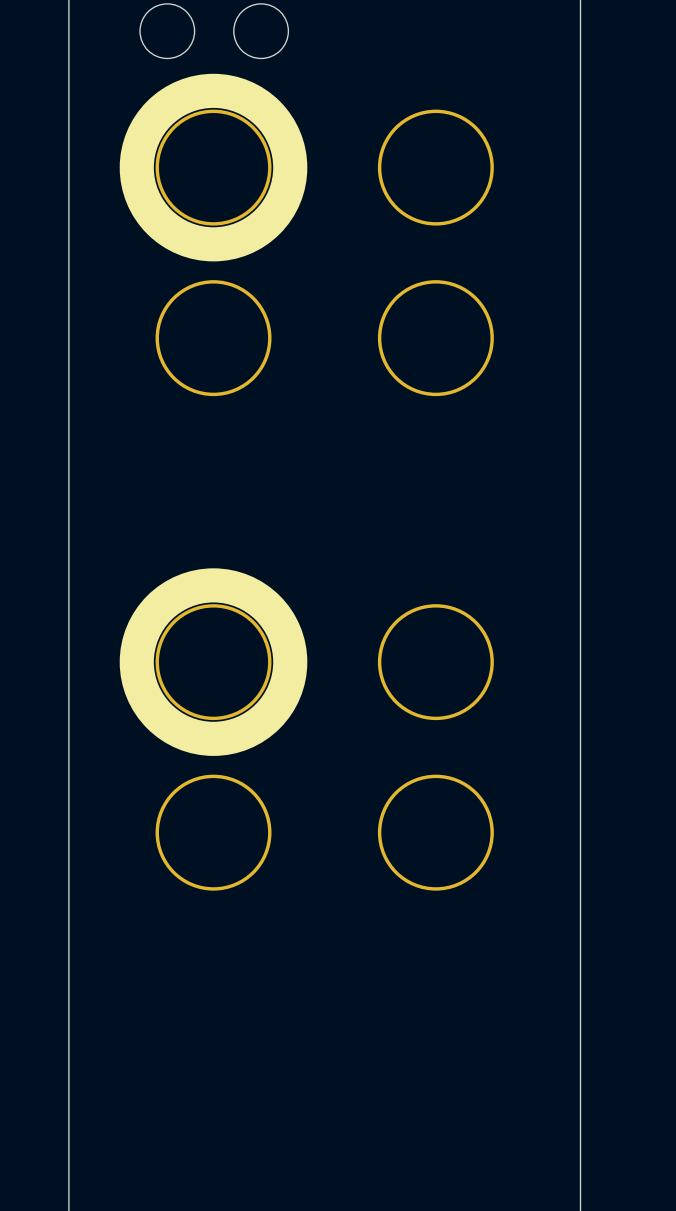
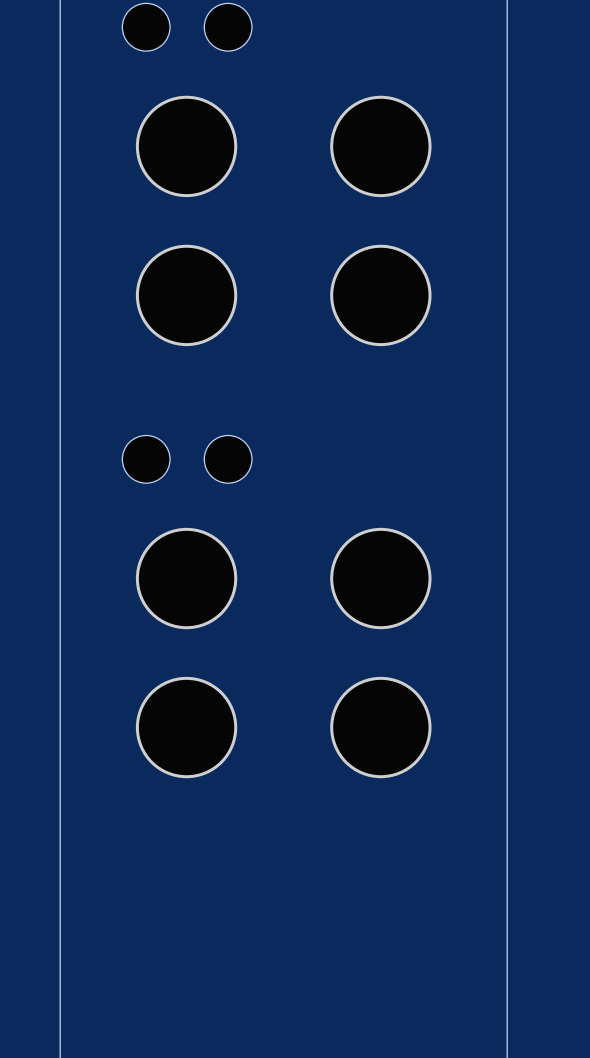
drawing: [119, 73, 308, 262] -> none
part: none -> (146, 459)
part: none -> (228, 459)
drawing: [119, 568, 308, 756] -> none

